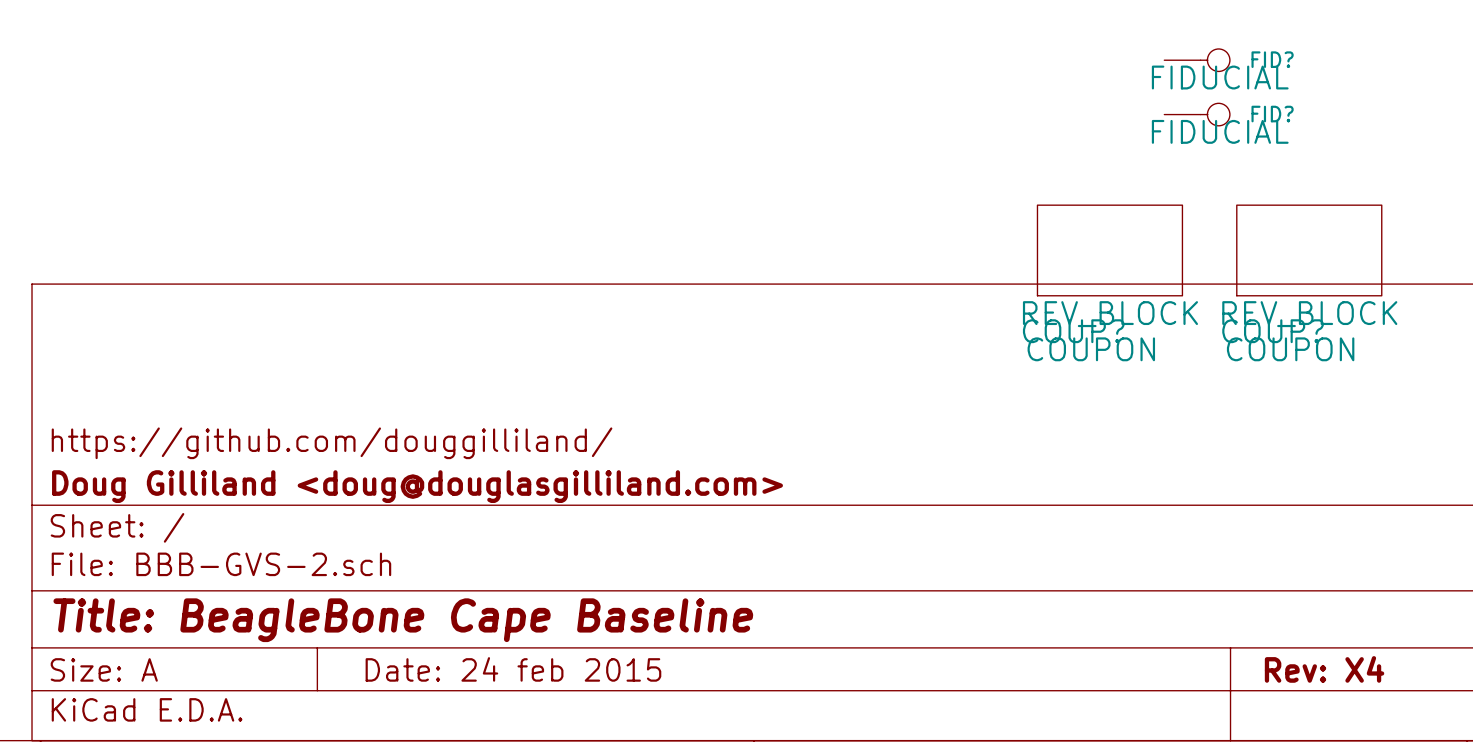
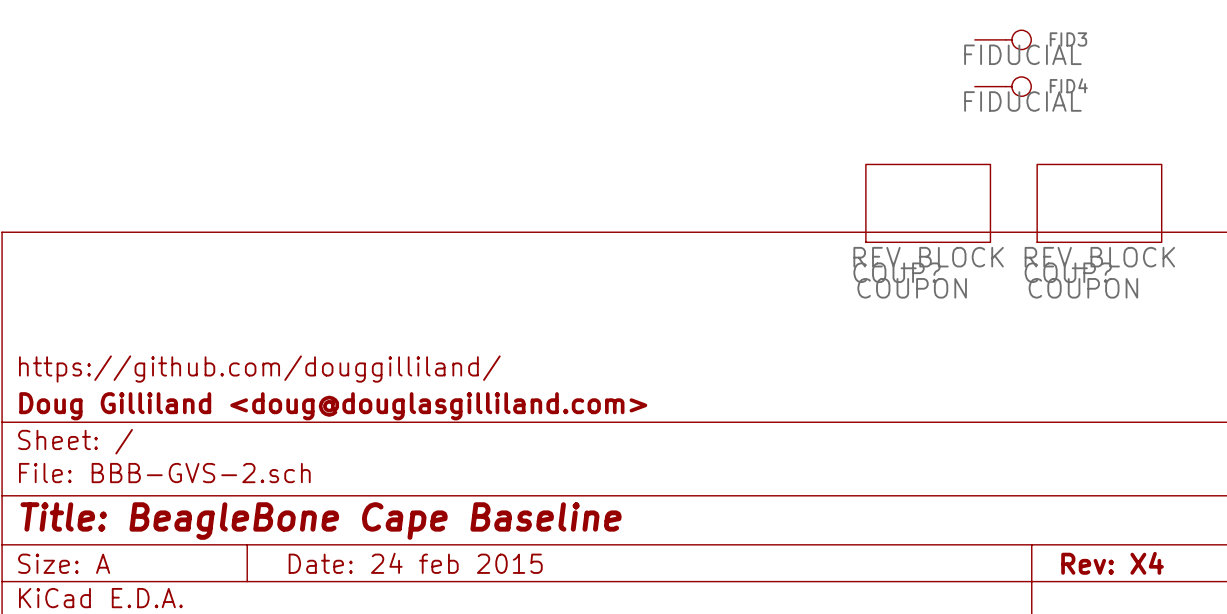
FID? name: FID? (1272, 59) -> FID3 (1068, 39)
FID? name: FID? (1272, 114) -> FID4 (1068, 85)

